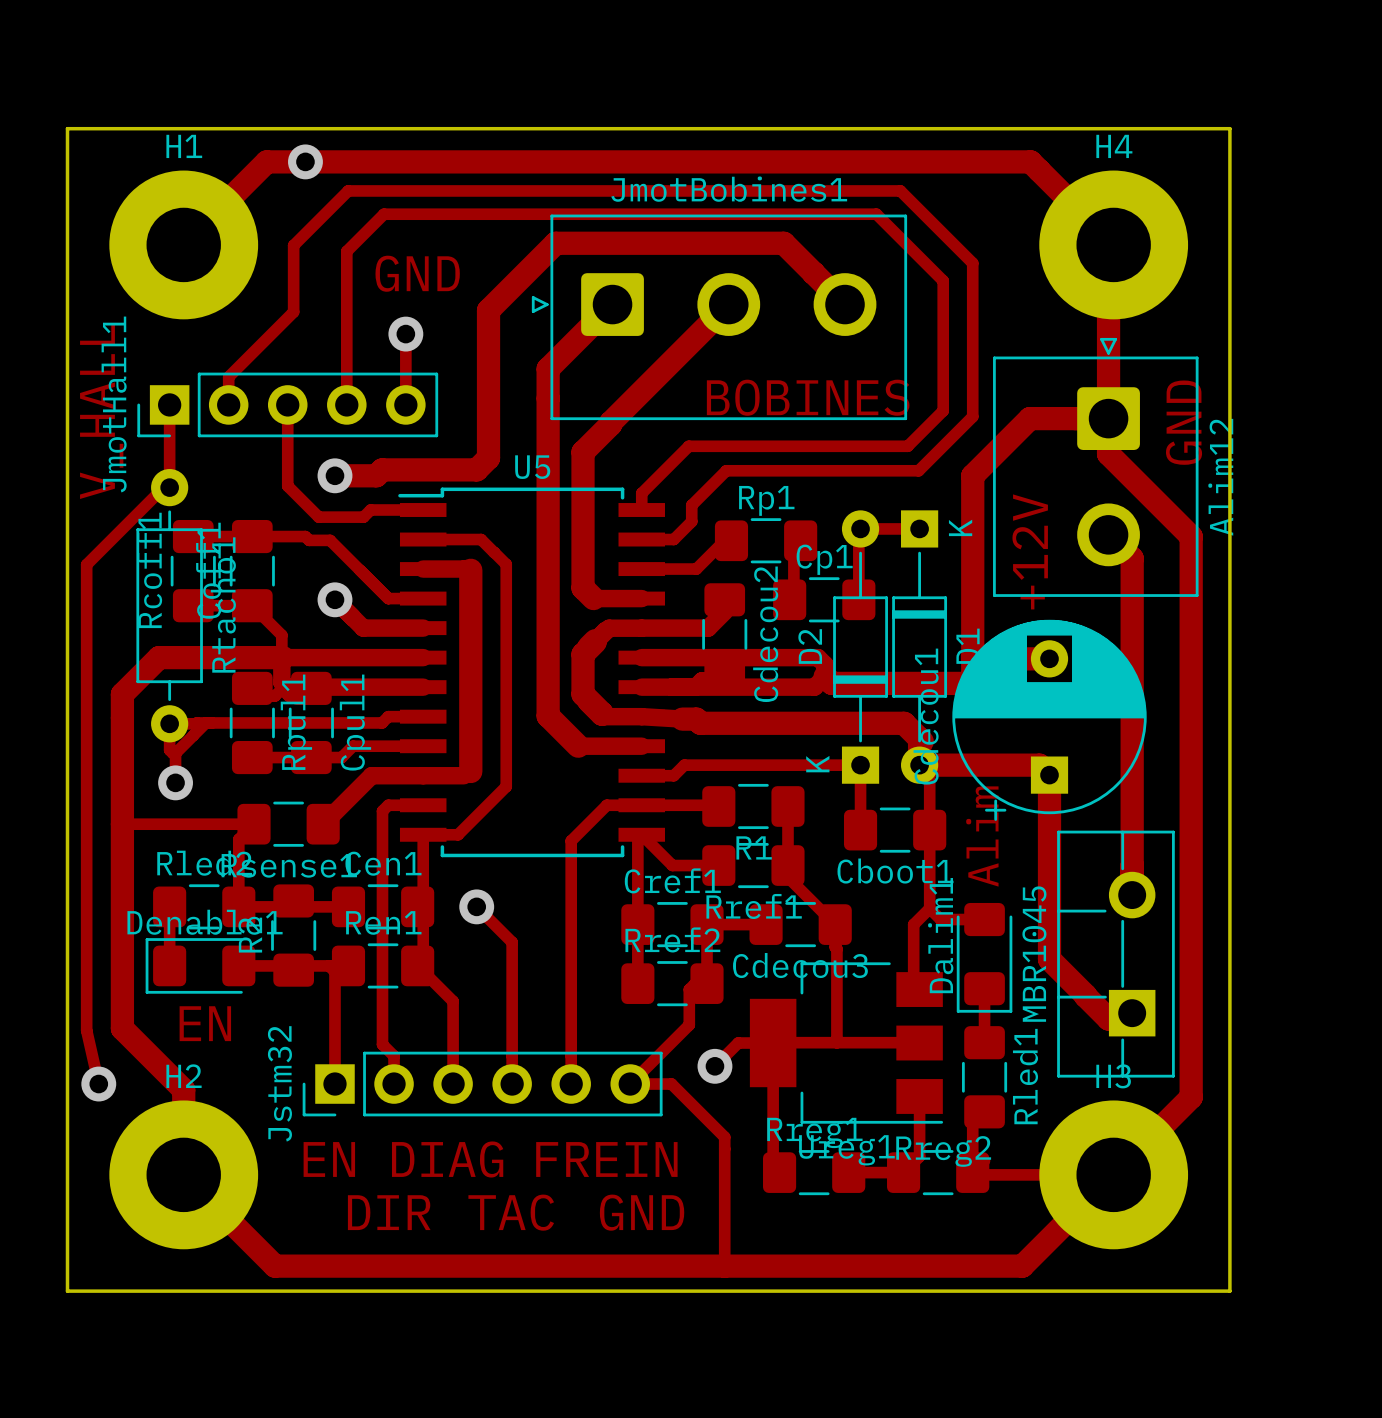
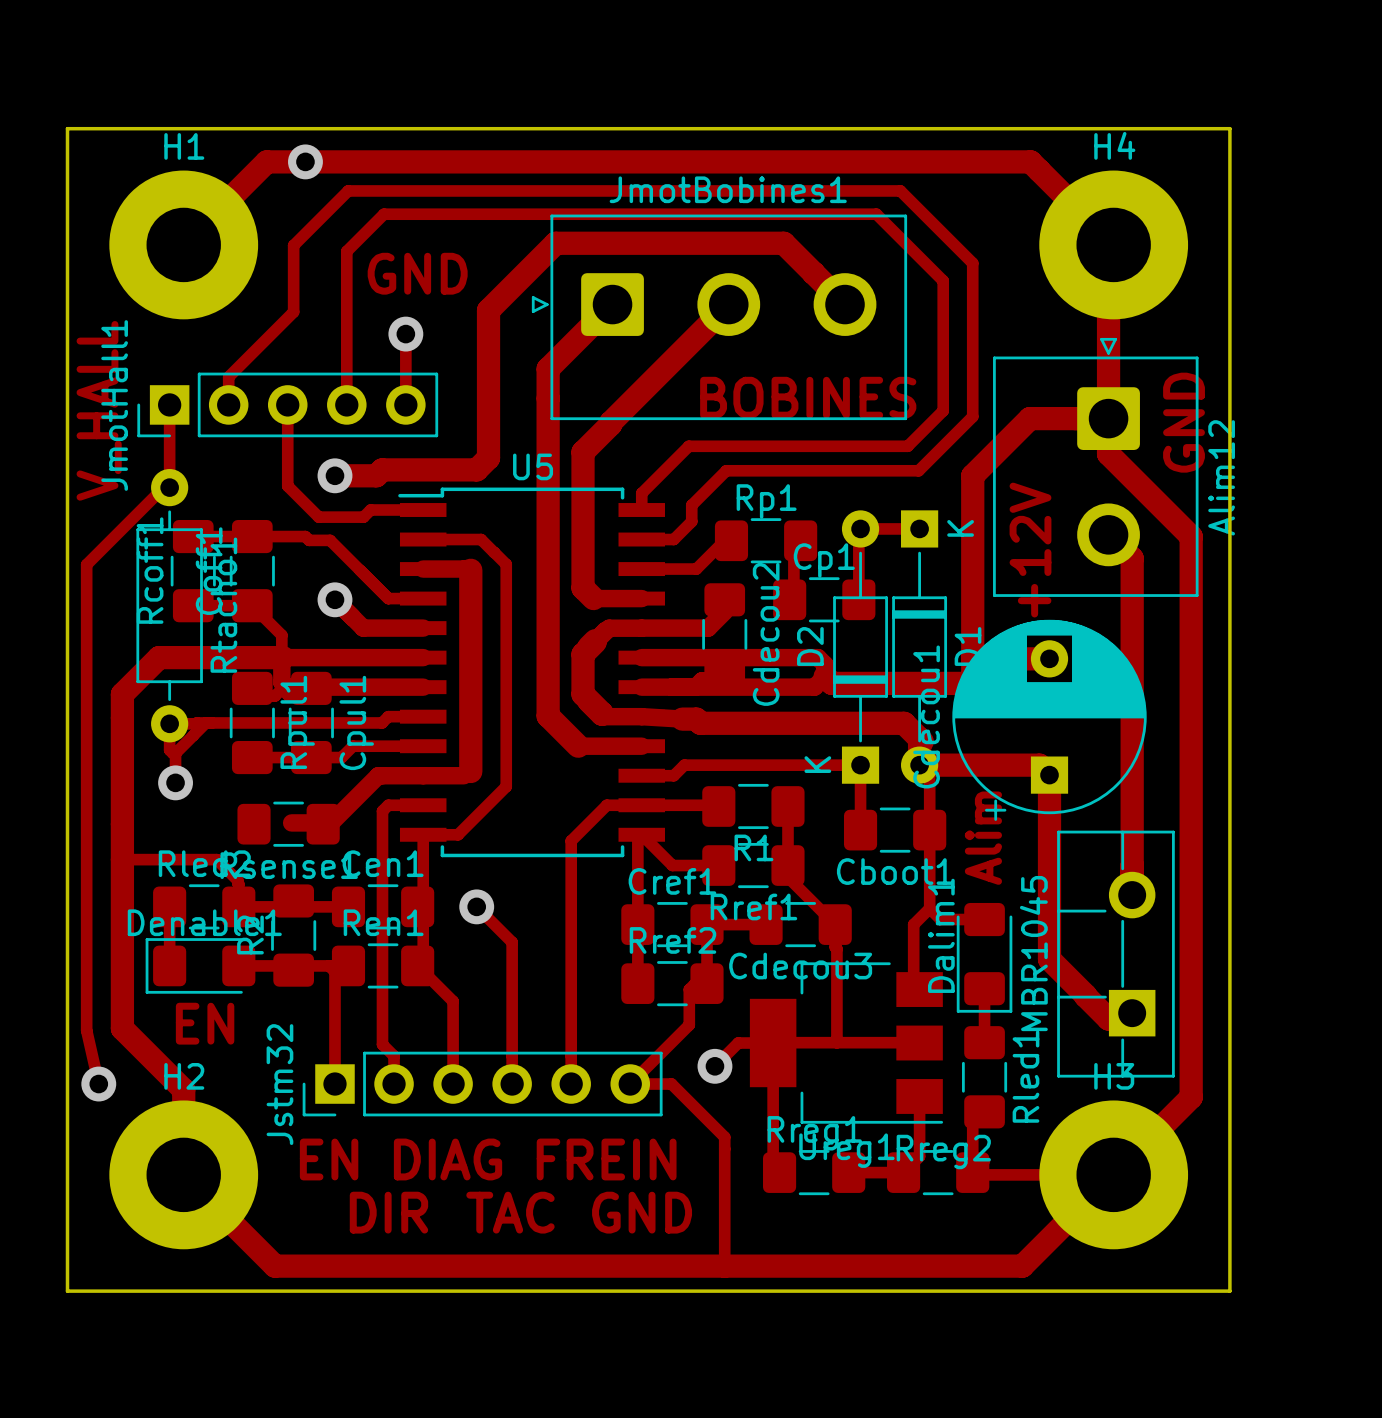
top track: (378, 775) (371, 775) (323, 824) -> (378, 775) (331, 822) (291, 822)
top track: (122, 824) (254, 824) (238, 839) (238, 884) -> (122, 859) (216, 859) (237, 880) (238, 884)

